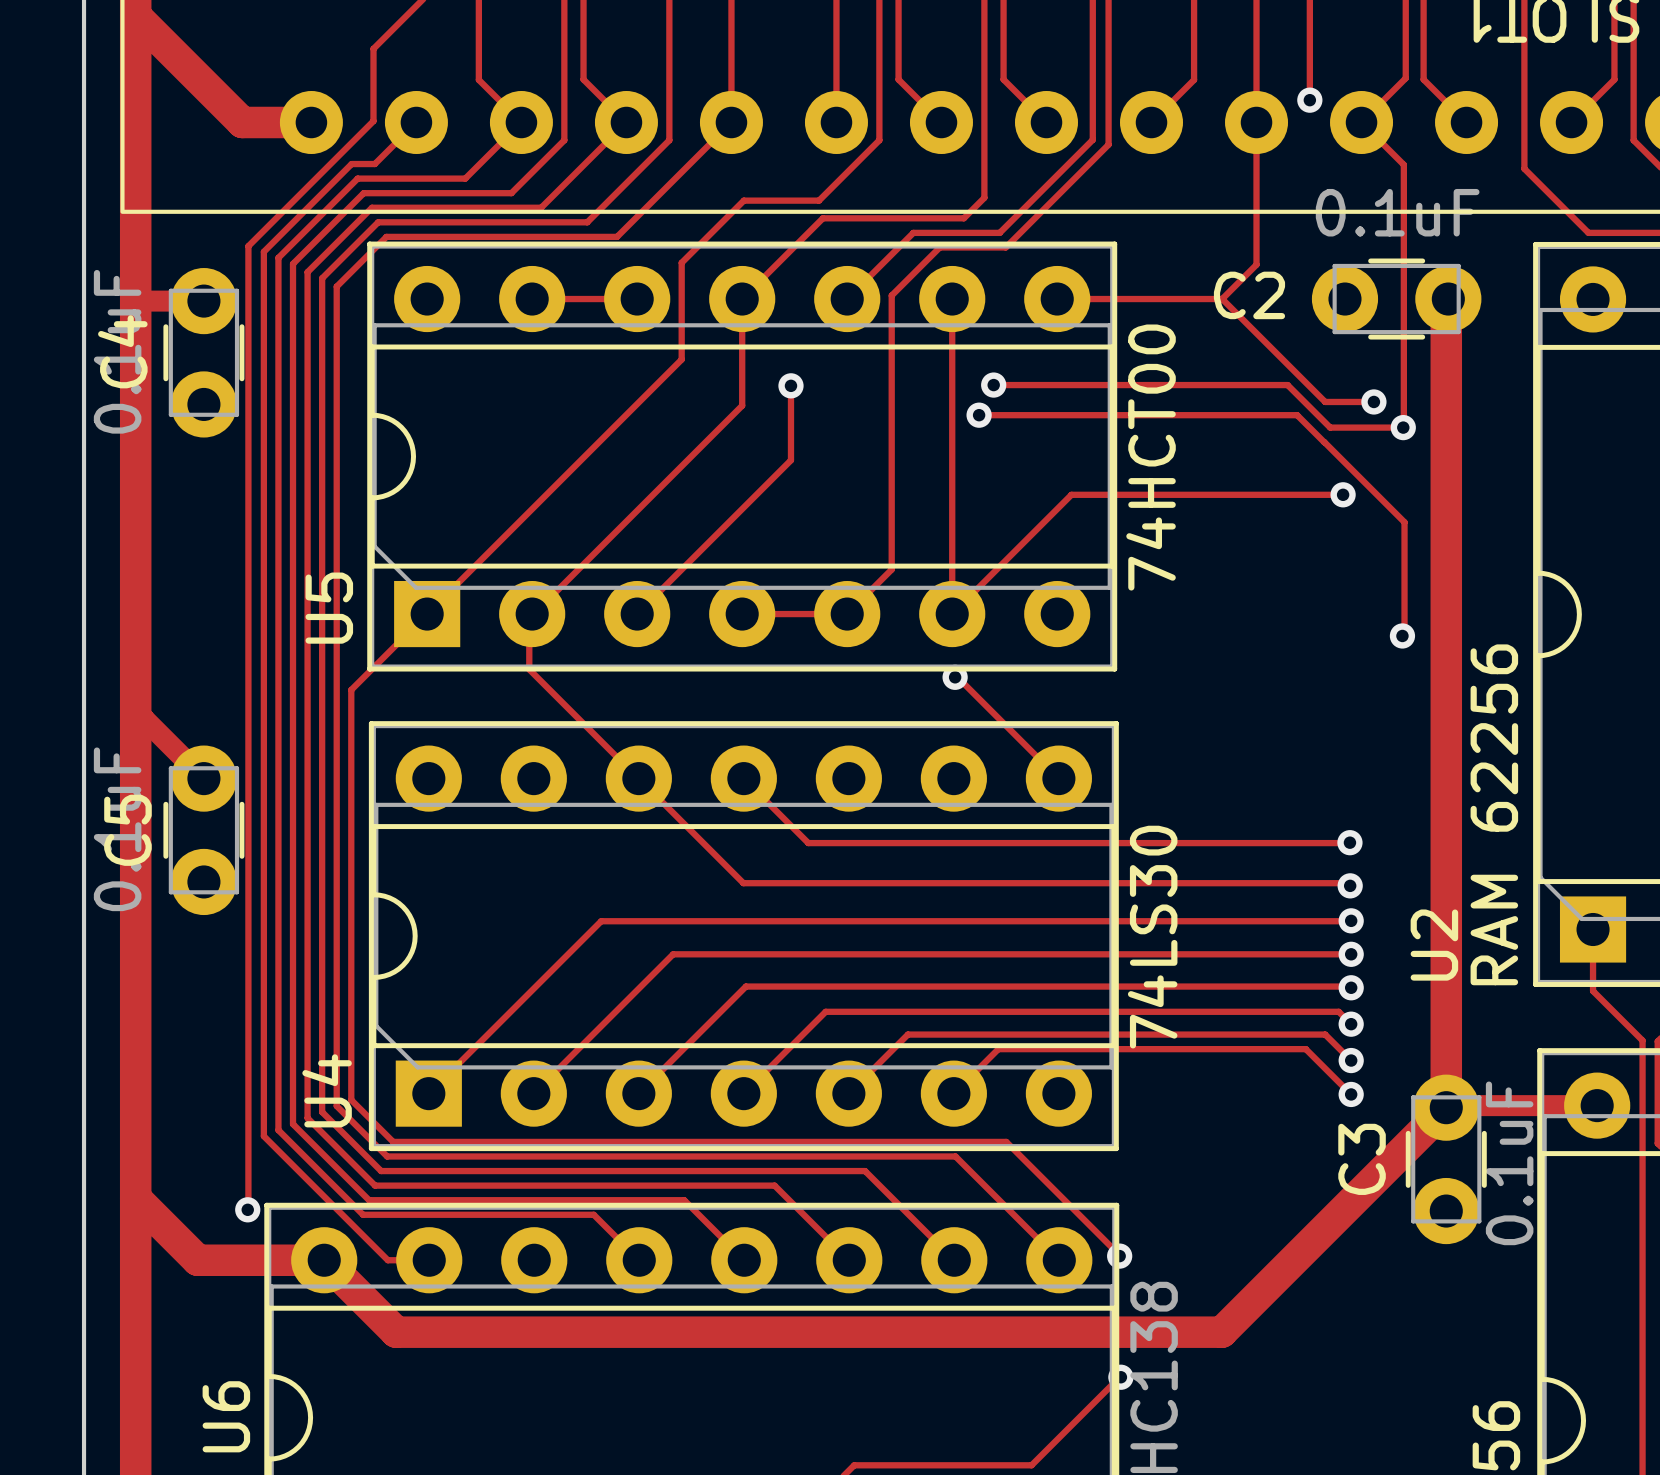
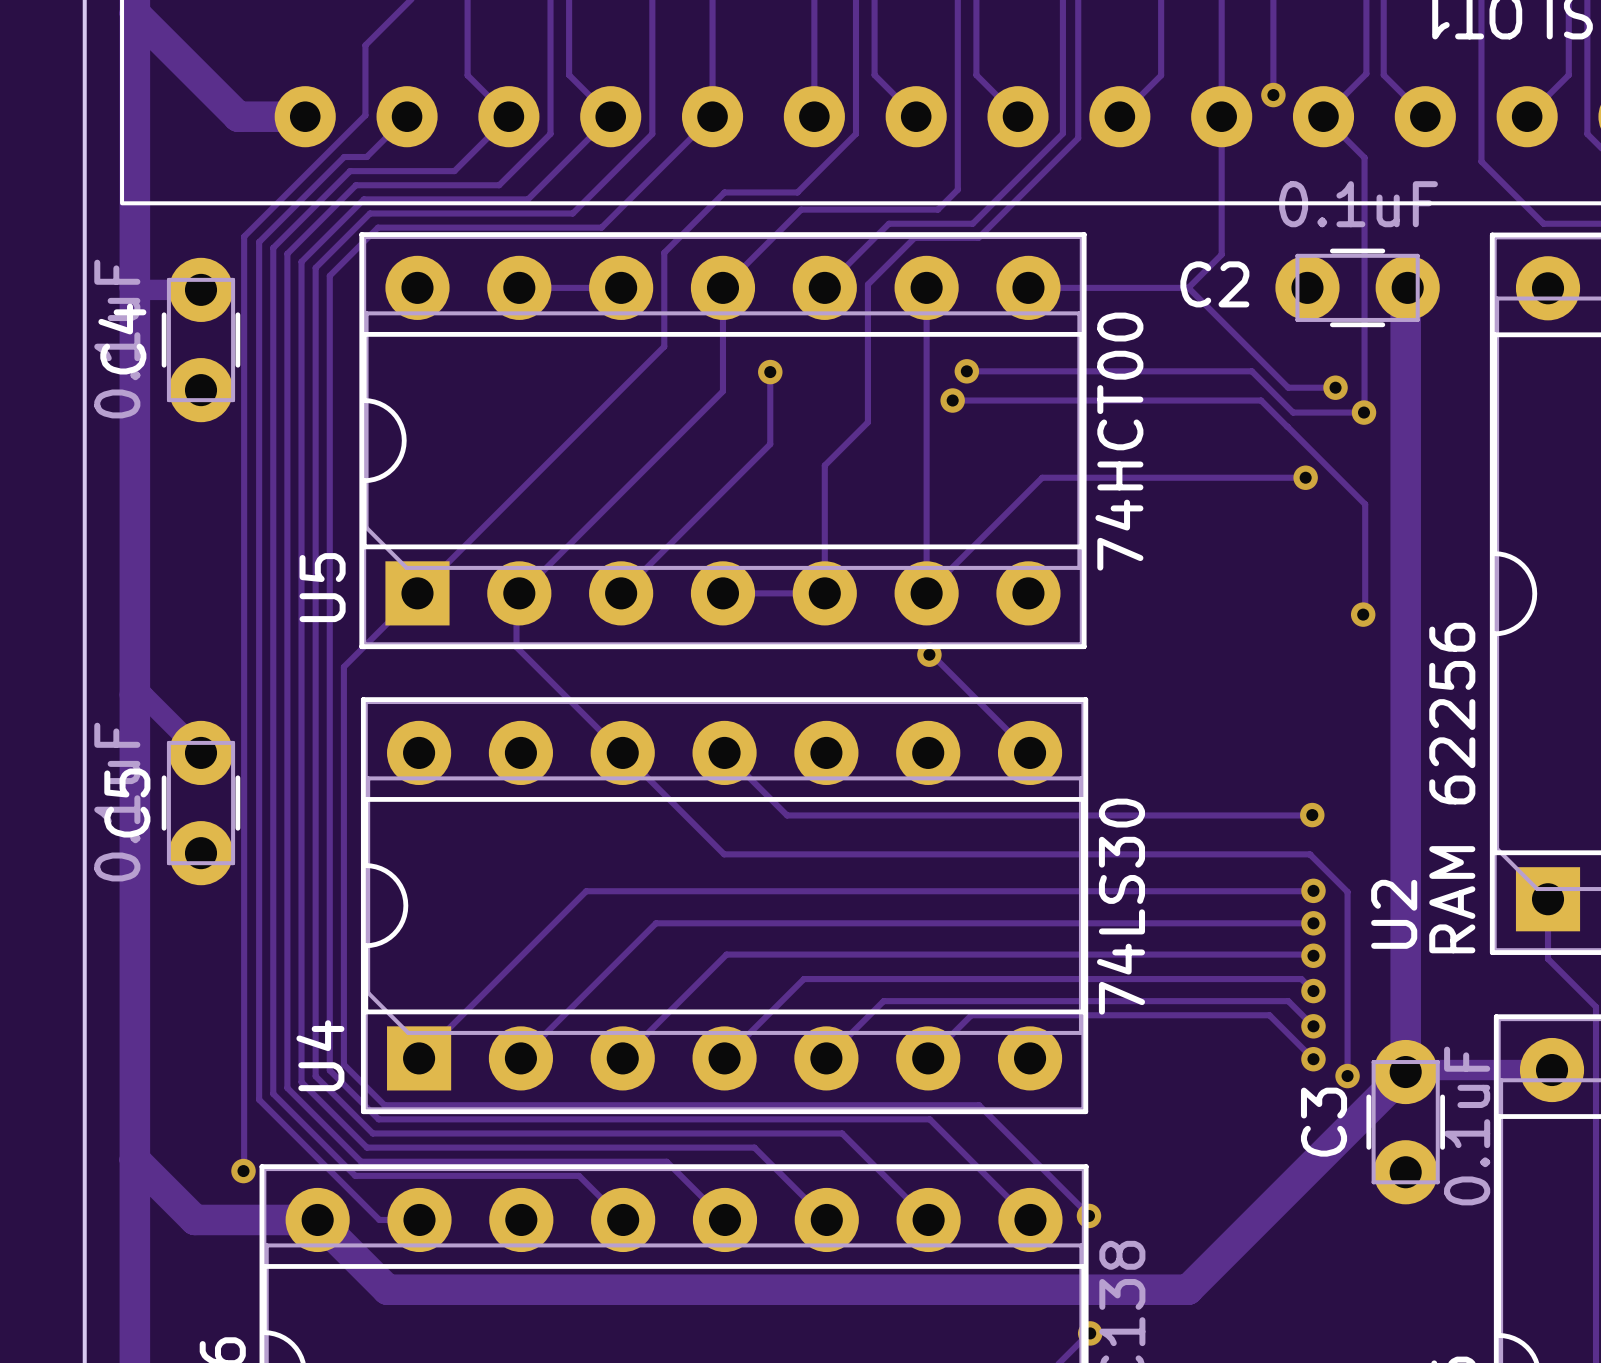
track: (891, 437) (891, 569) (847, 614) -> (867, 422) (824, 465) (824, 593)
track: none -> (1312, 856) (1347, 891) (1347, 1076)
via position: (1350, 885) -> (1347, 1076)

